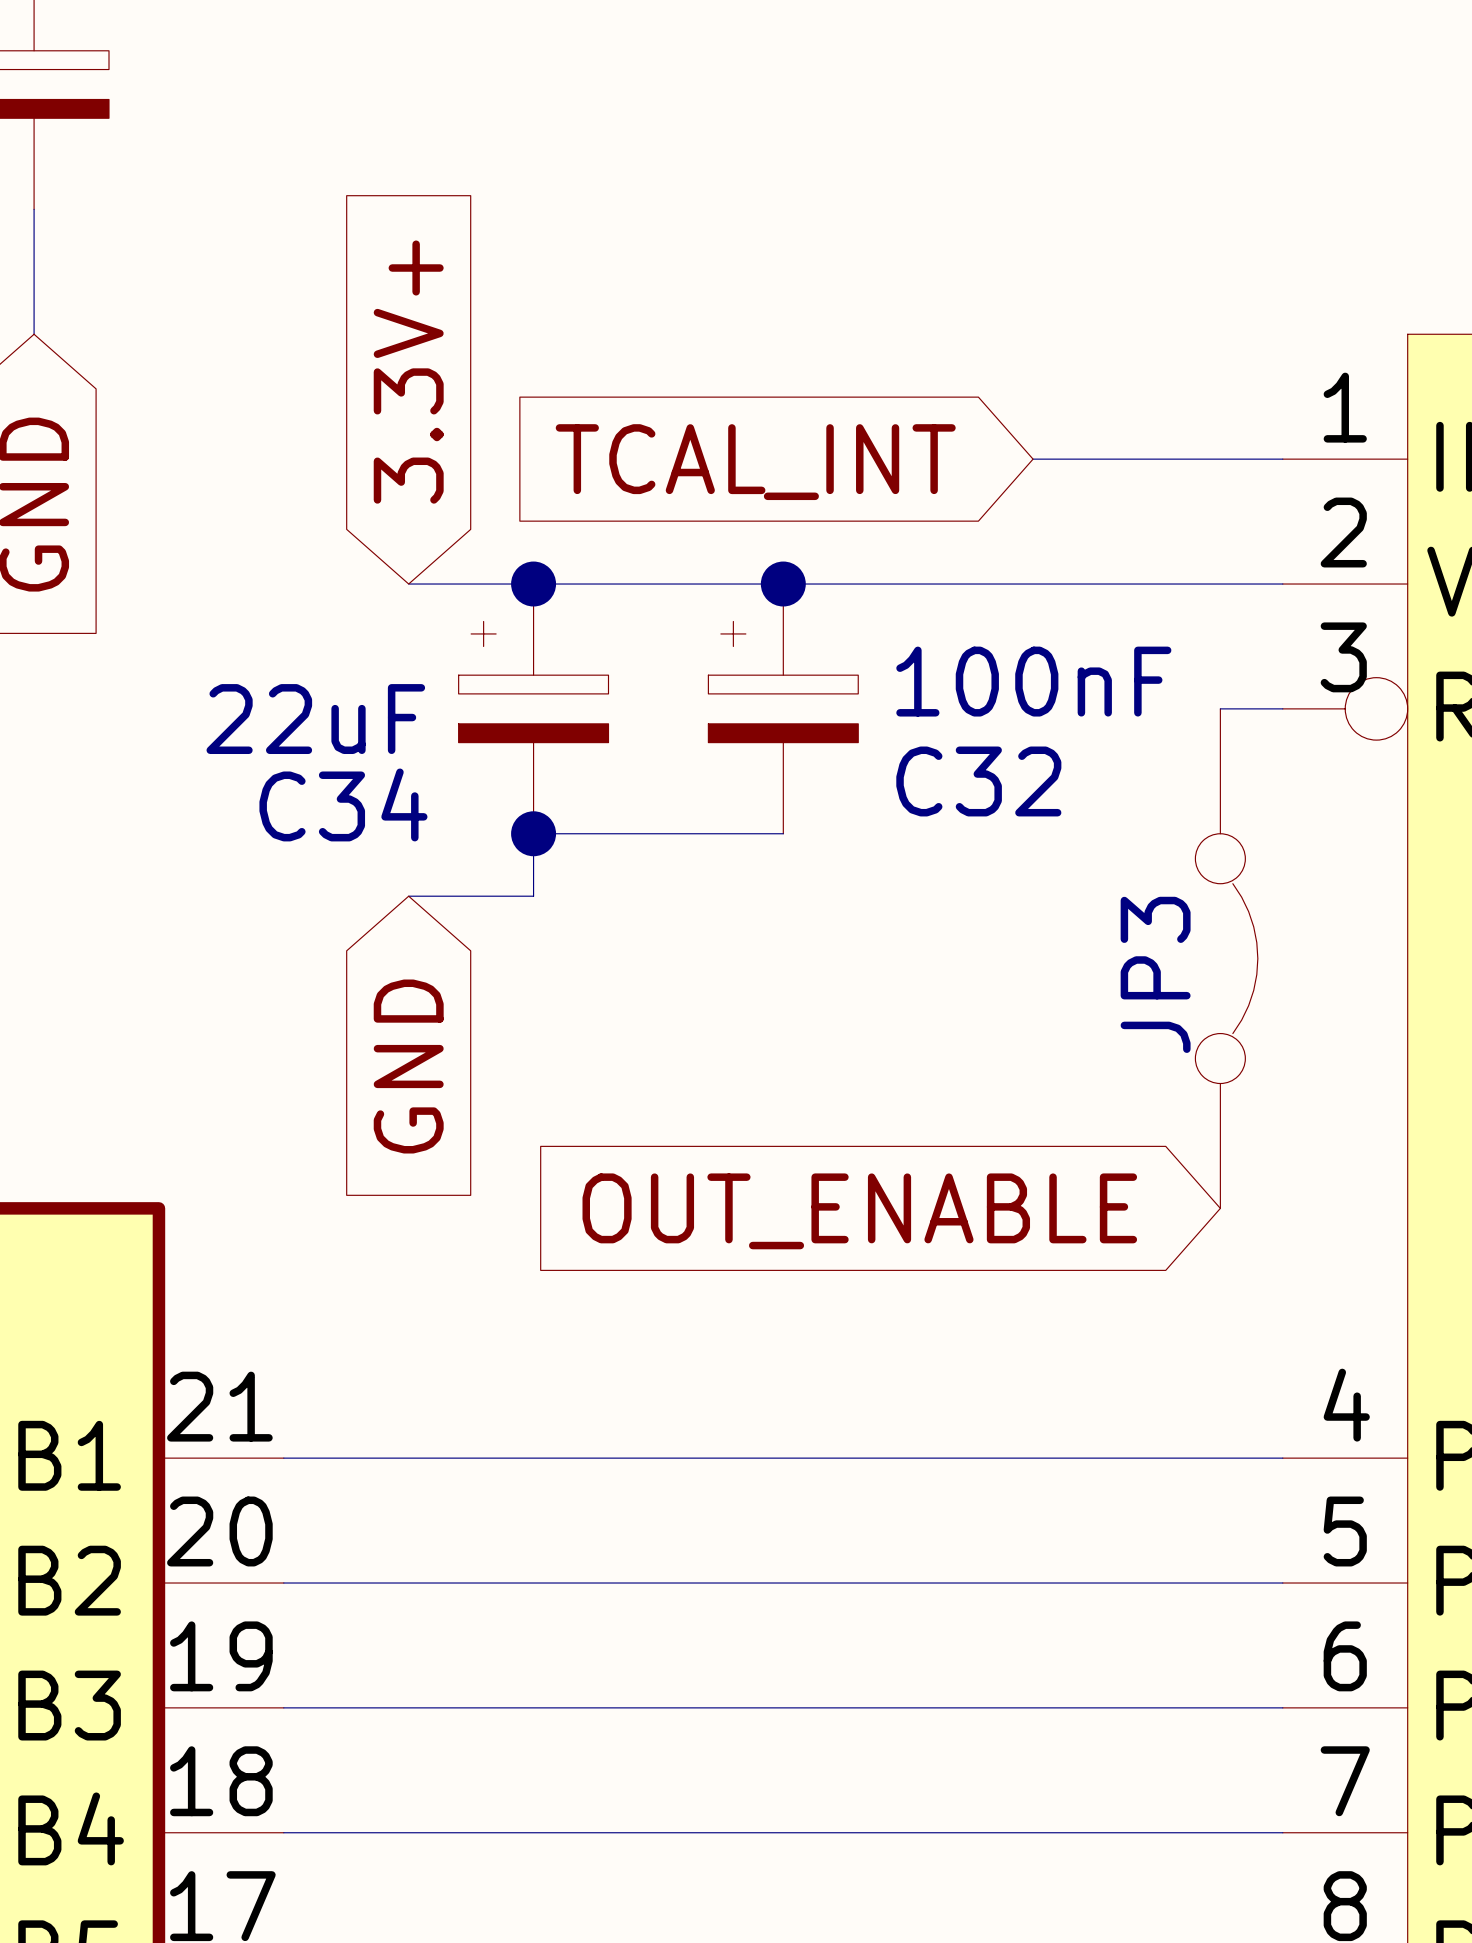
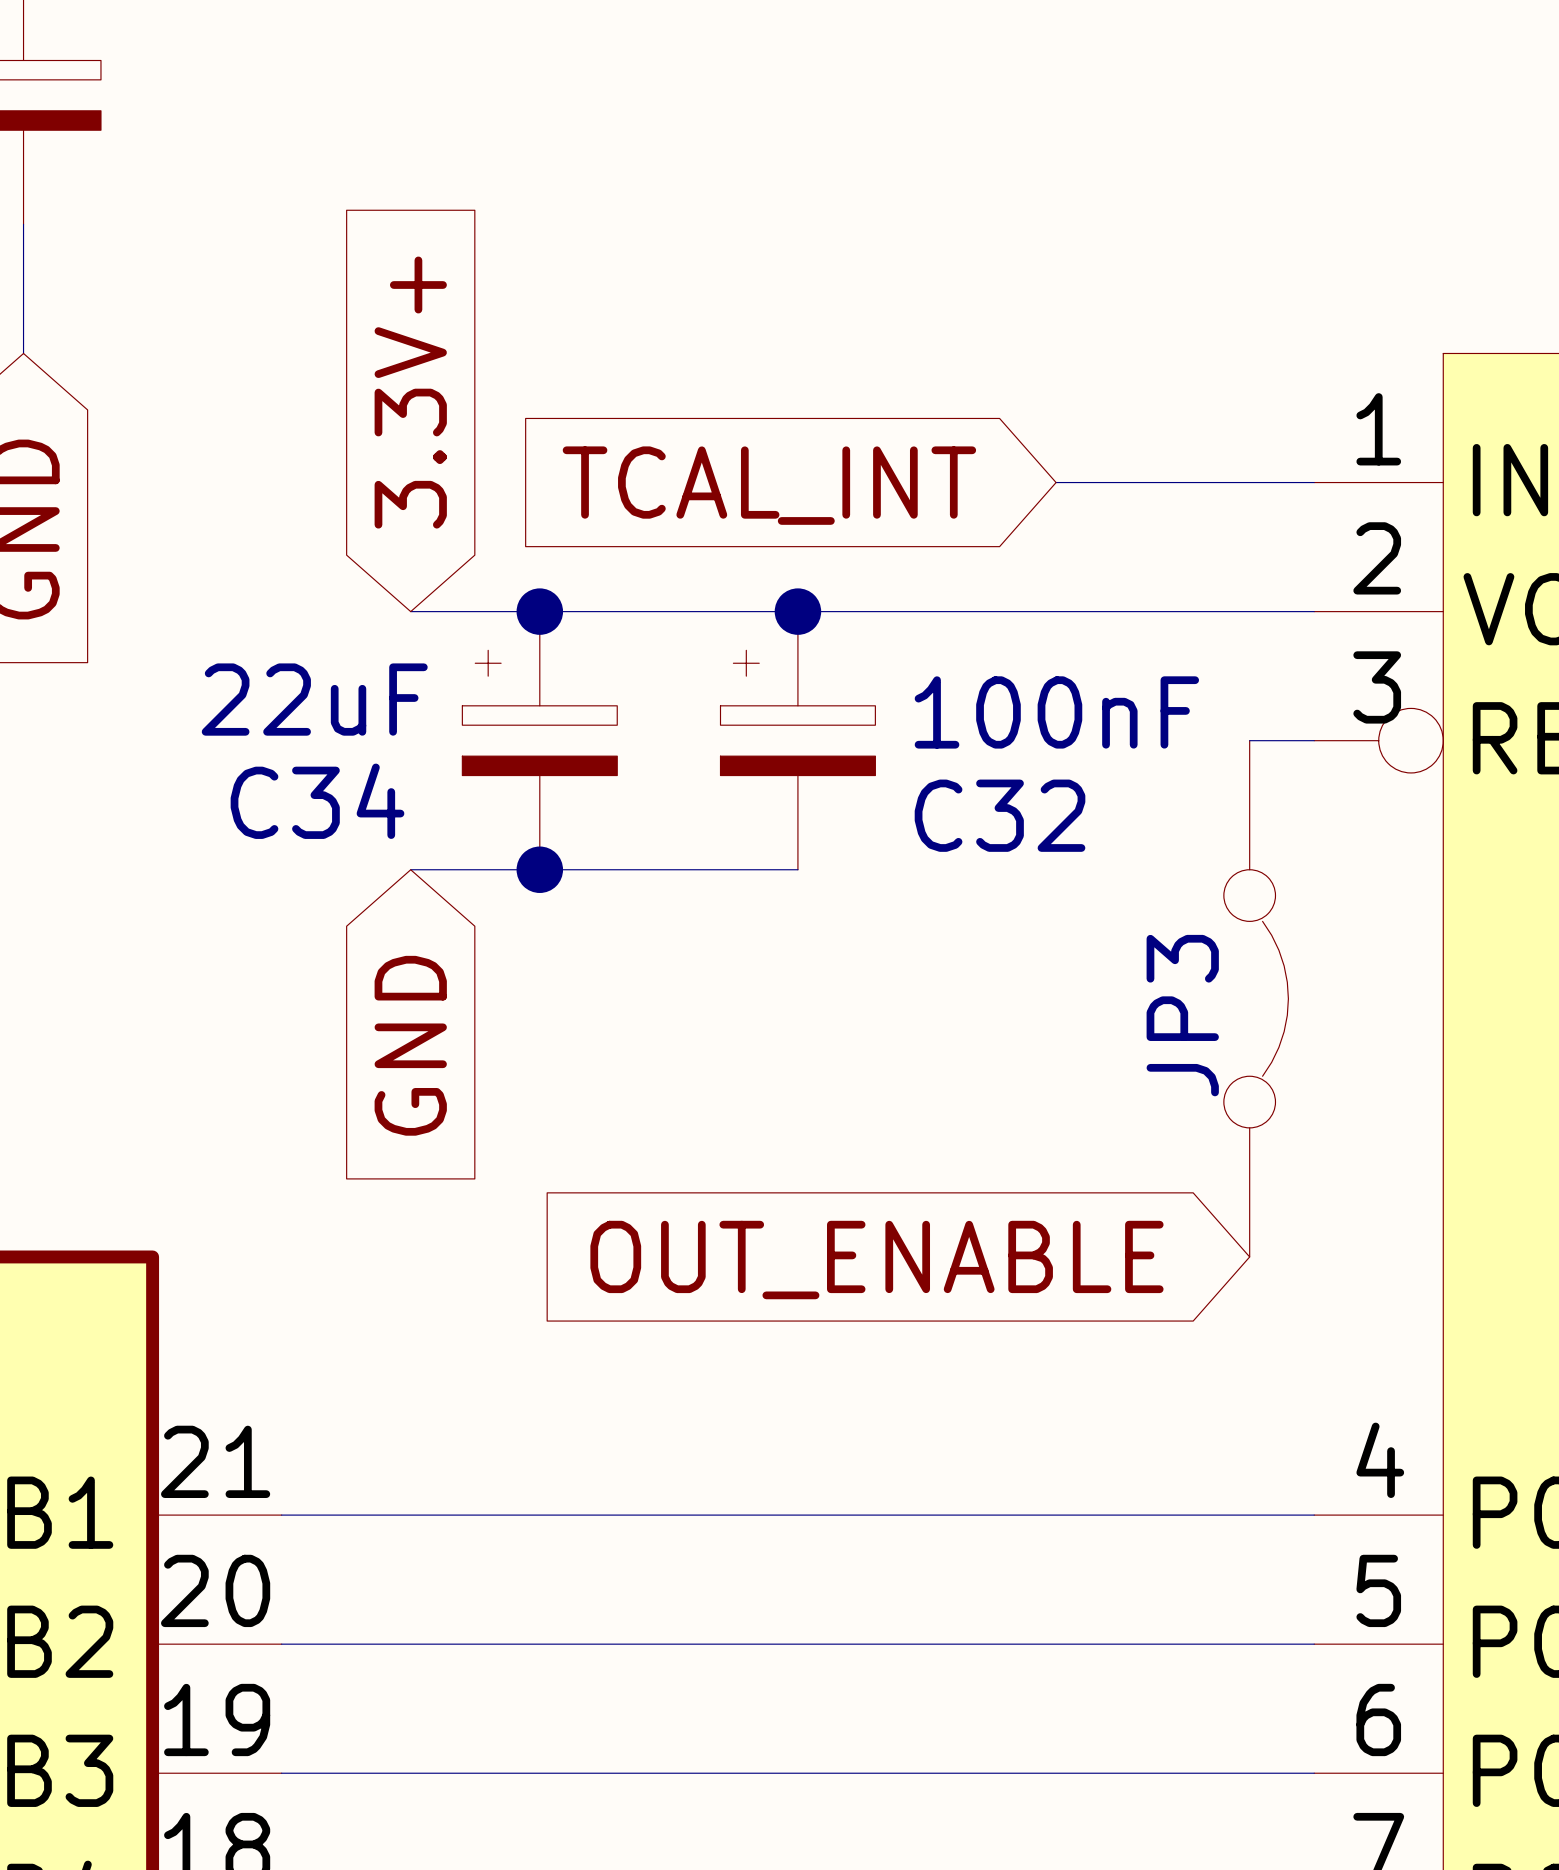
C34 value position: 22uF (315, 719) -> 22uF (314, 699)
C34 name position: C34 (343, 804) -> C34 (317, 801)
wire: (533, 833) (533, 896) (408, 896) -> (539, 869) (410, 869)
global label position: GND (408, 1066) -> GND (410, 1045)

